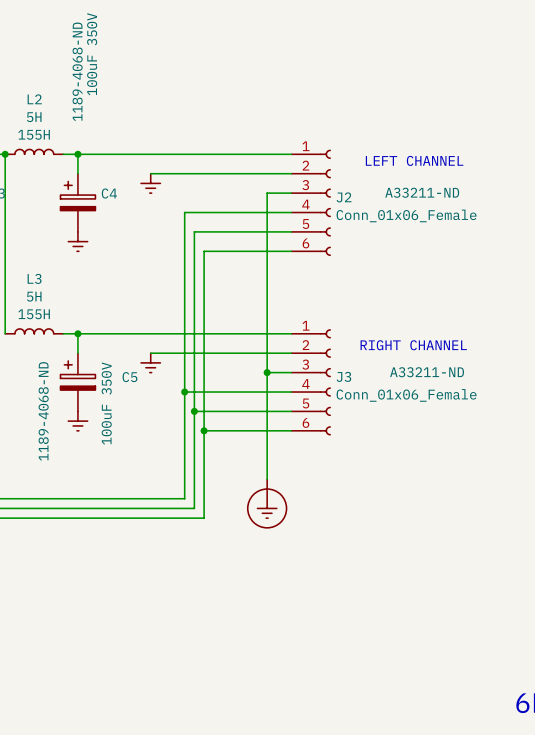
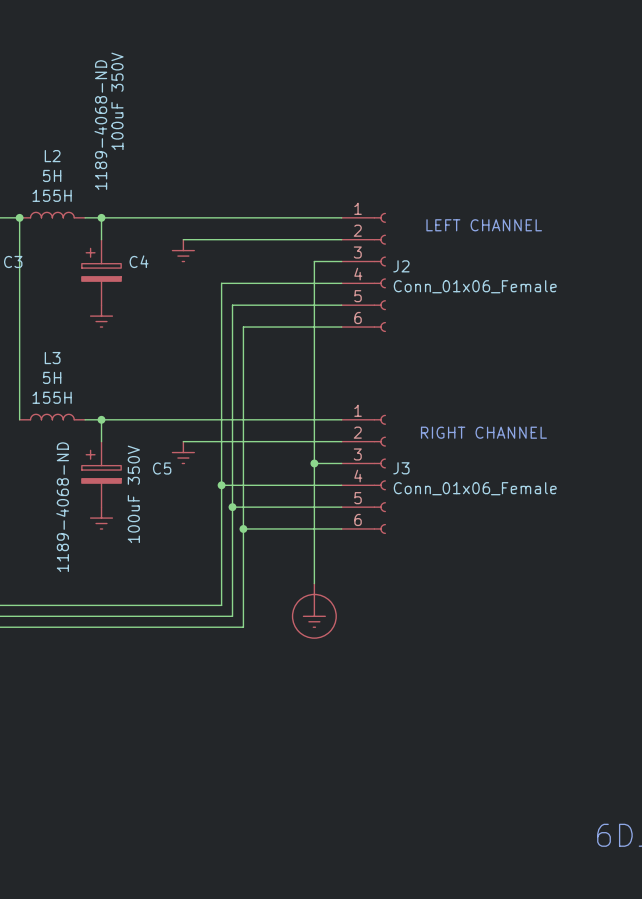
J2 text: A33211-ND (422, 192) -> none
J3 text: A33211-ND (427, 372) -> none

